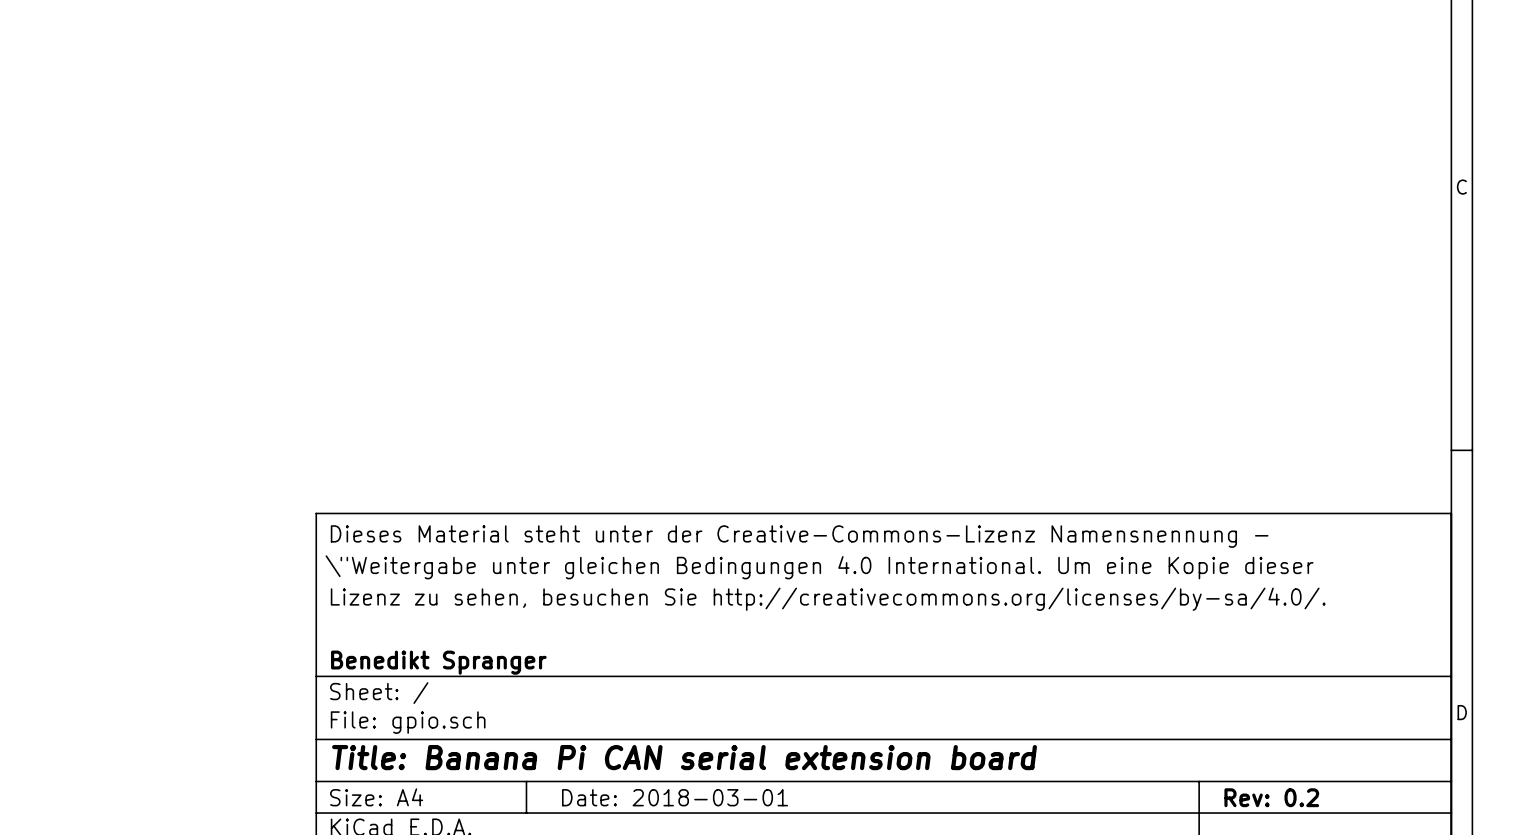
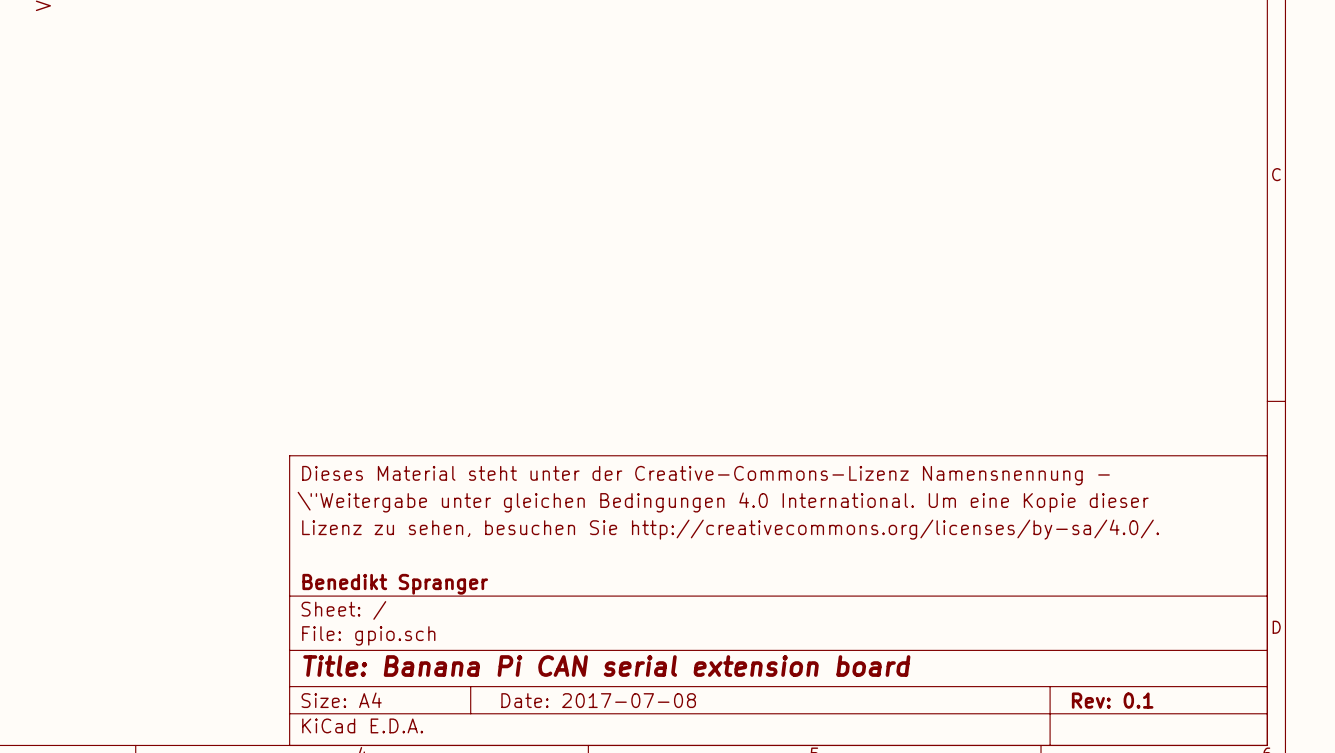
title block: Date: 2018-03-01 (675, 797) -> Date: 2017-07-08 (598, 700)
title block: Rev: 0.2 (1271, 797) -> Rev: 0.1 (1112, 700)

